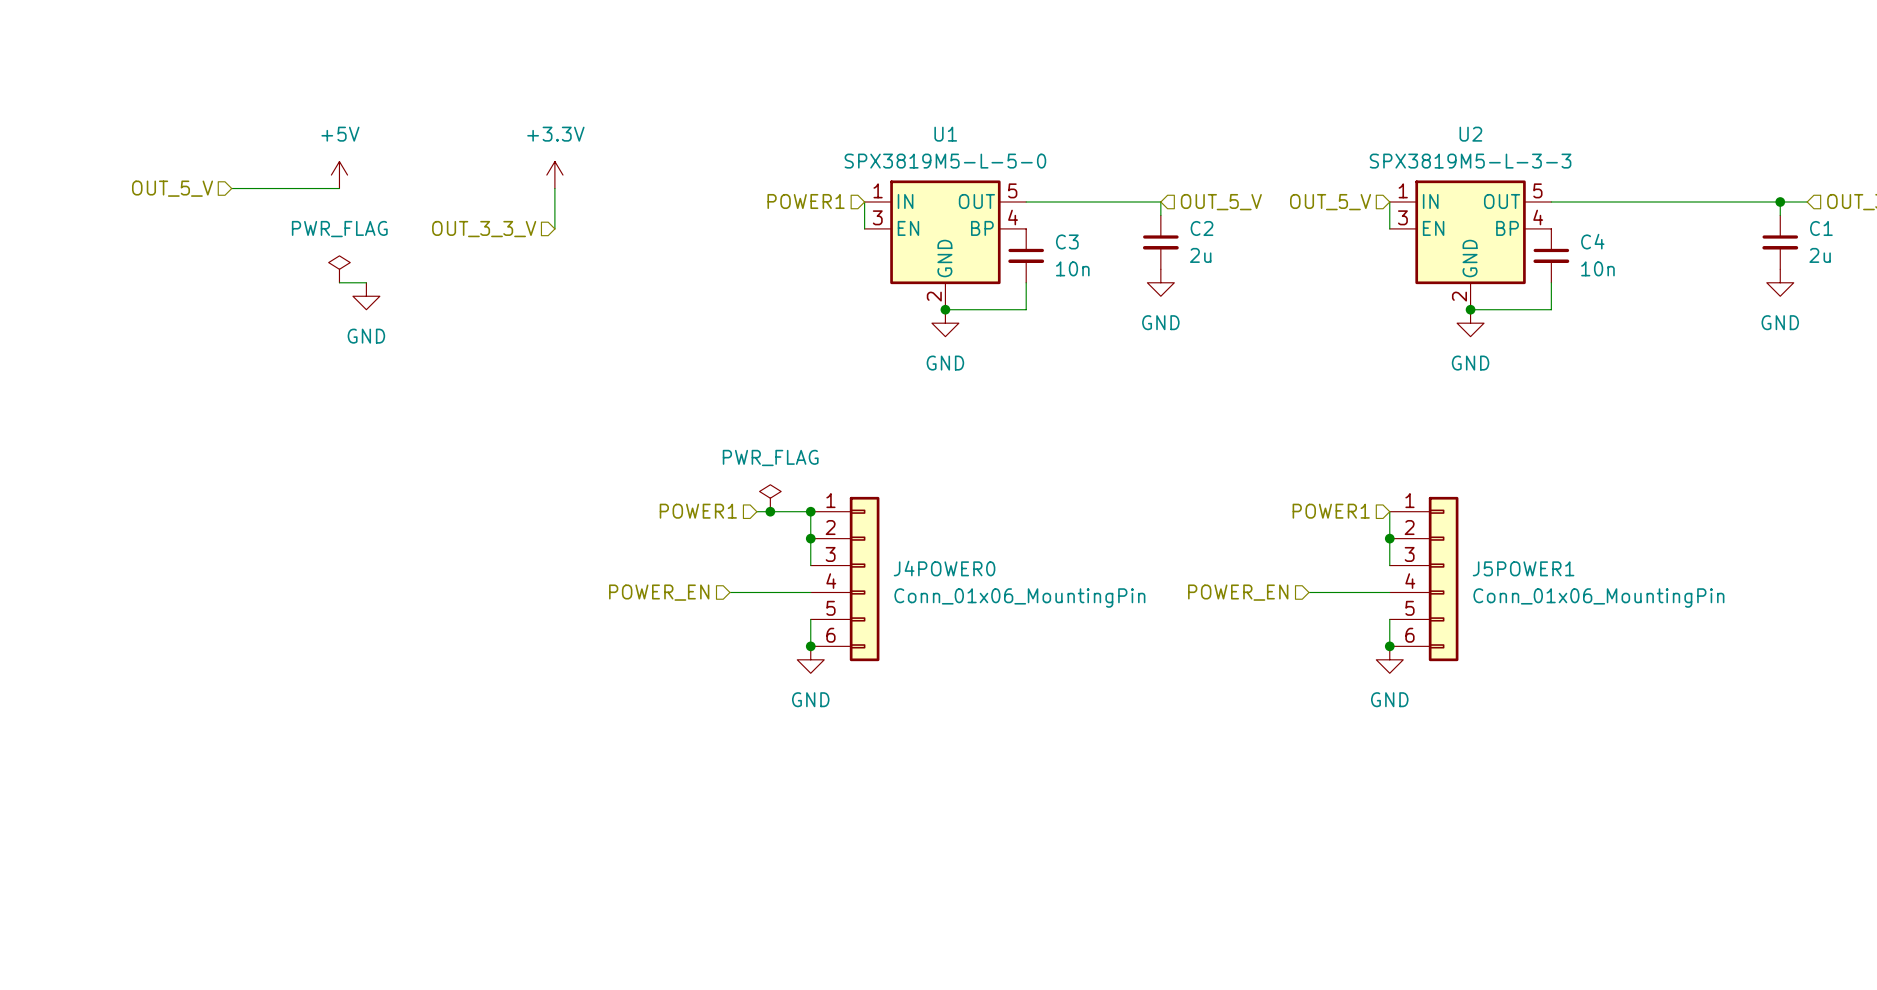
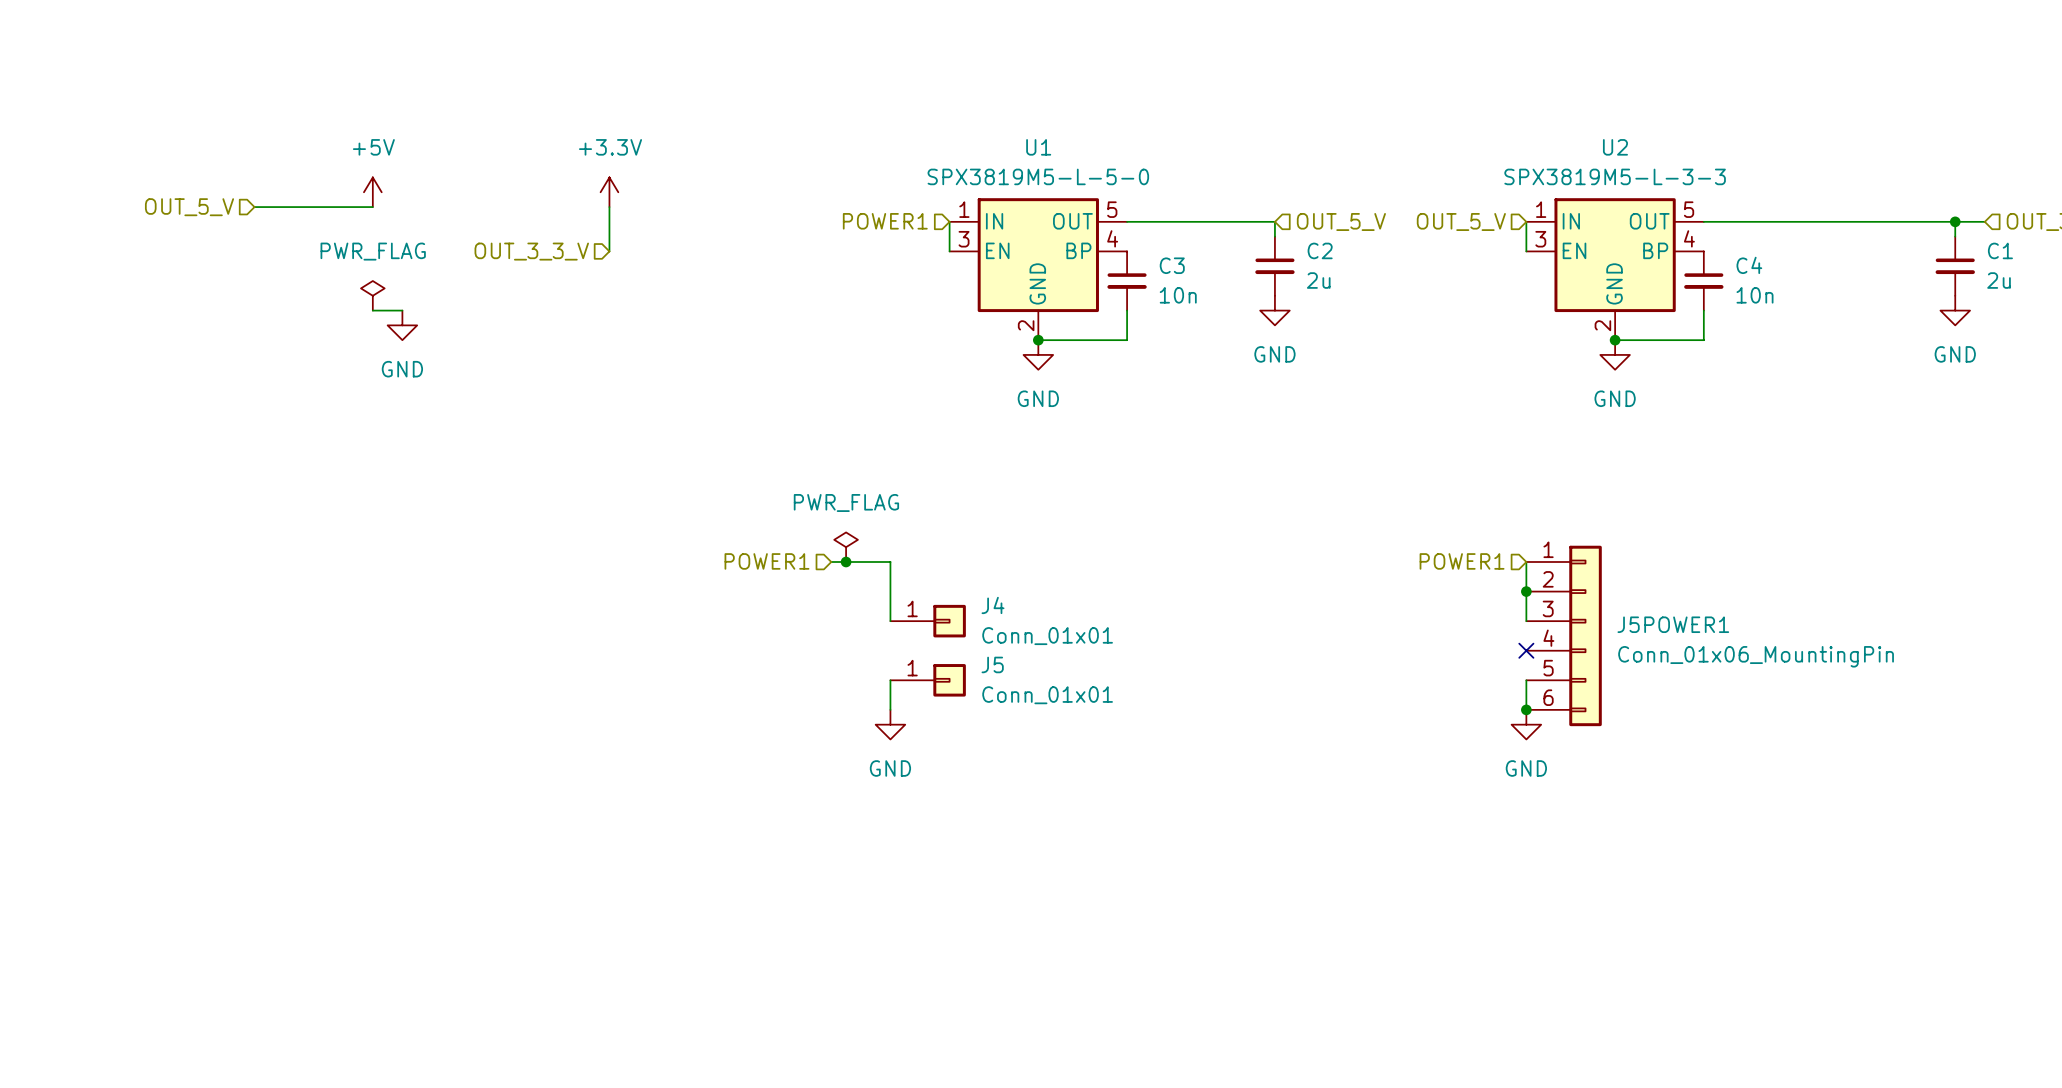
junction: (810, 511) -> none
junction: (810, 538) -> none
J4: none -> Conn_01x01 (928, 621)
J4POWER0: Conn_01x06_MountingPin (845, 579) -> none
hierarchical label: POWER_EN (659, 592) -> none
wire: (729, 592) (810, 592) -> none
hierarchical label: POWER_EN (1238, 592) -> none
wire: (1308, 592) (1389, 592) -> none
no-connect mark: none -> (1526, 650)
J5: none -> Conn_01x01 (928, 680)
junction: (810, 646) -> none

